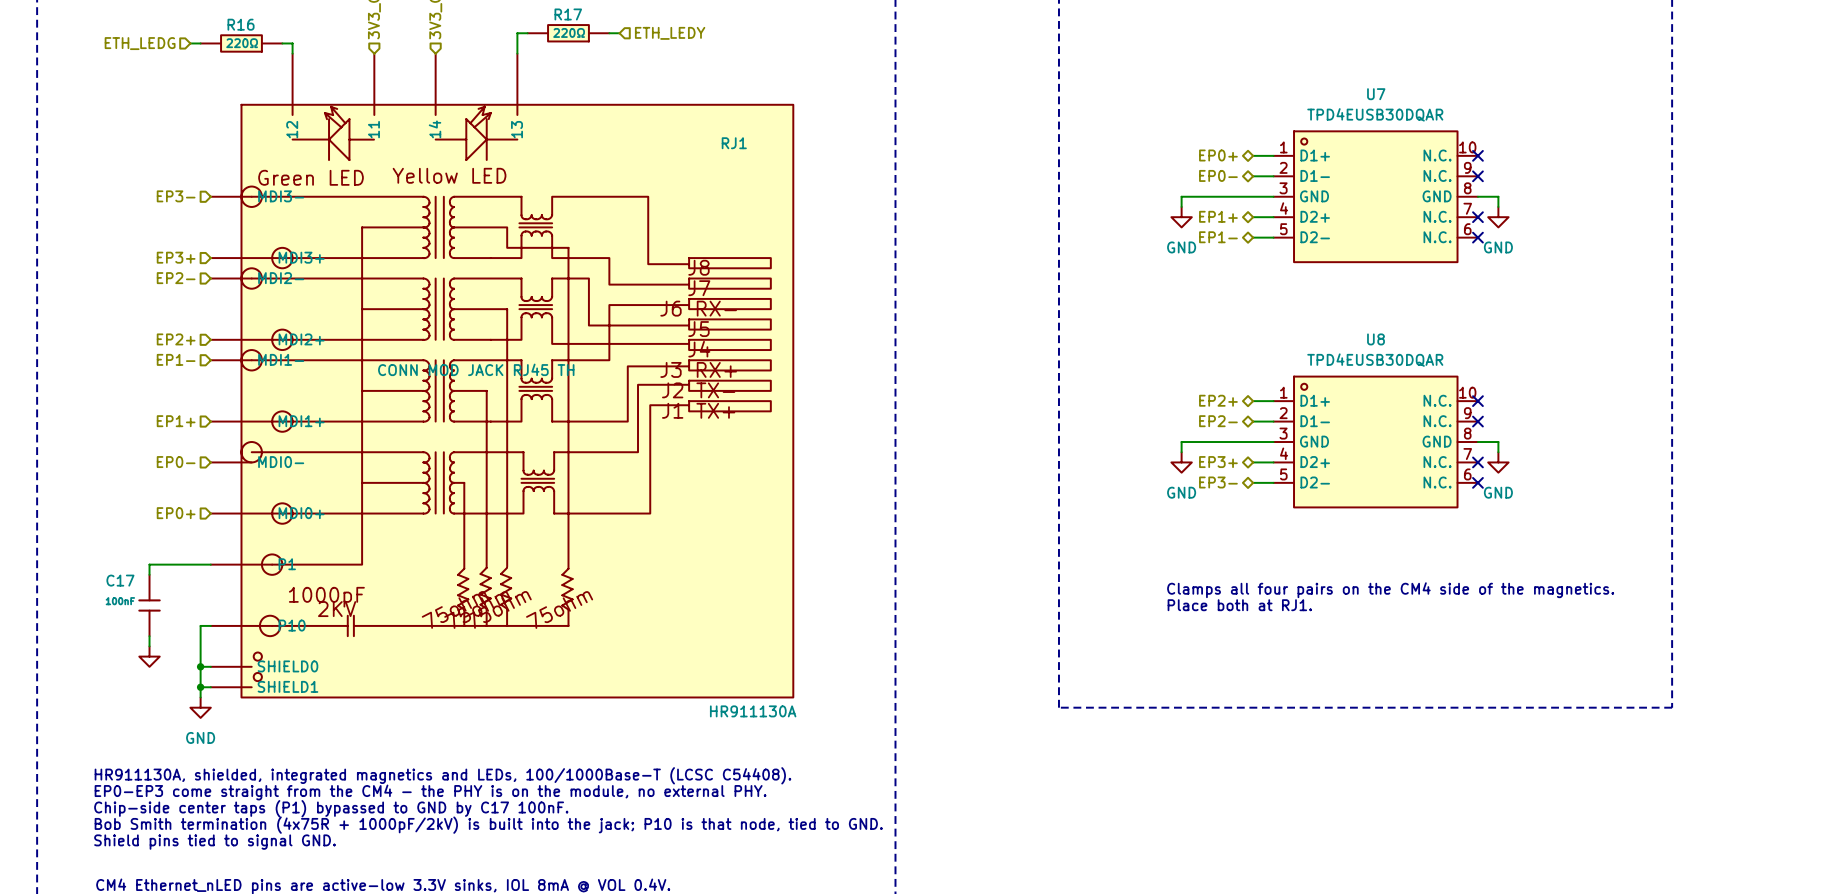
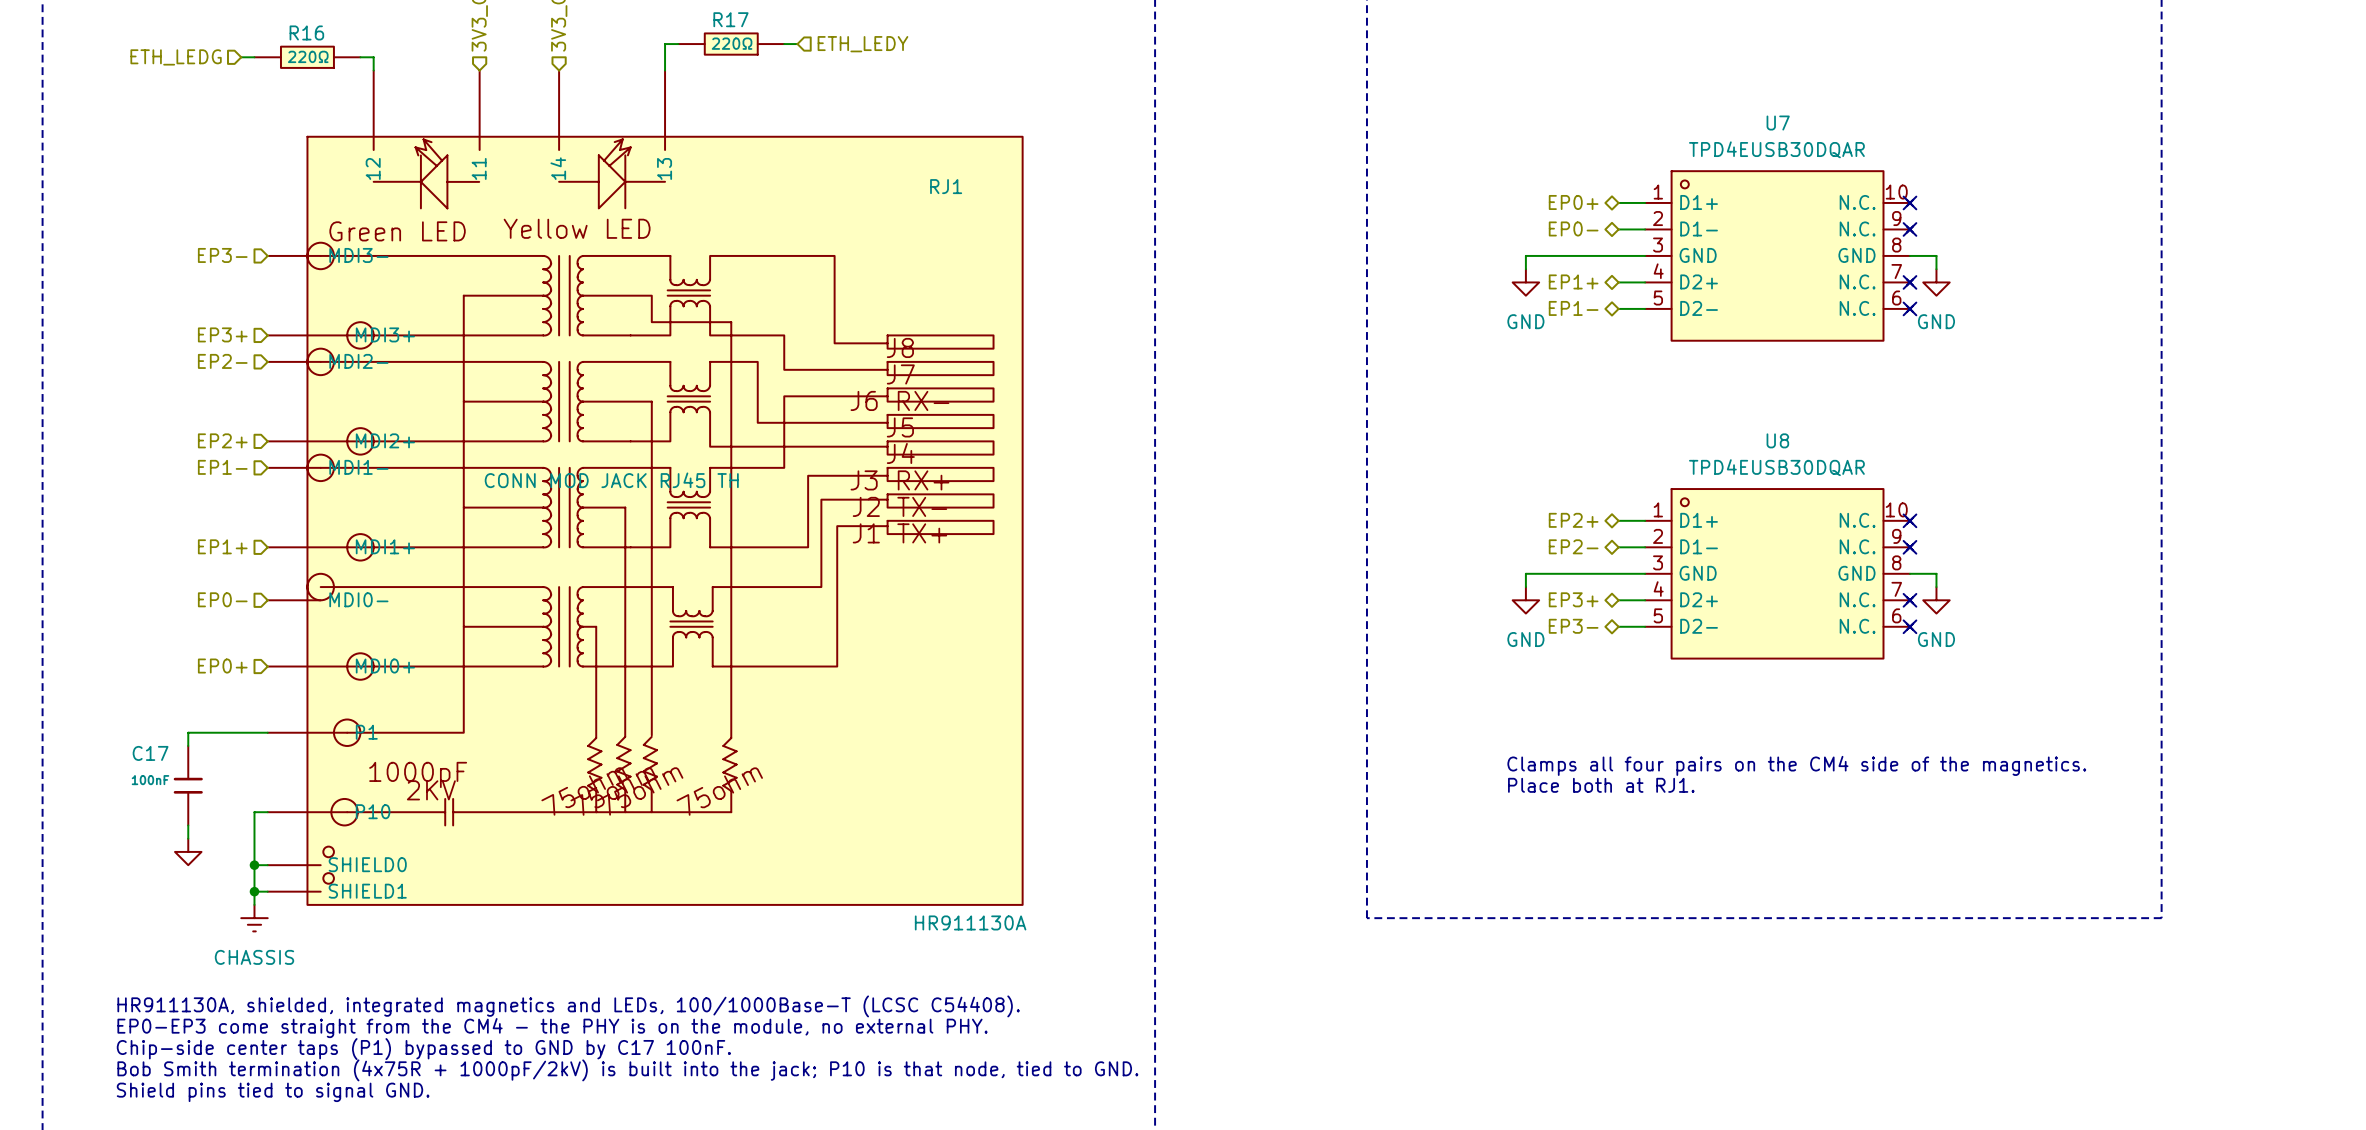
U7 symbol: [1273, 131, 1478, 263] -> [1645, 171, 1914, 341]
U8 symbol: [1273, 376, 1478, 508] -> [1645, 489, 1914, 659]
power symbol: GND (200, 707) -> CHASSIS (254, 918)

